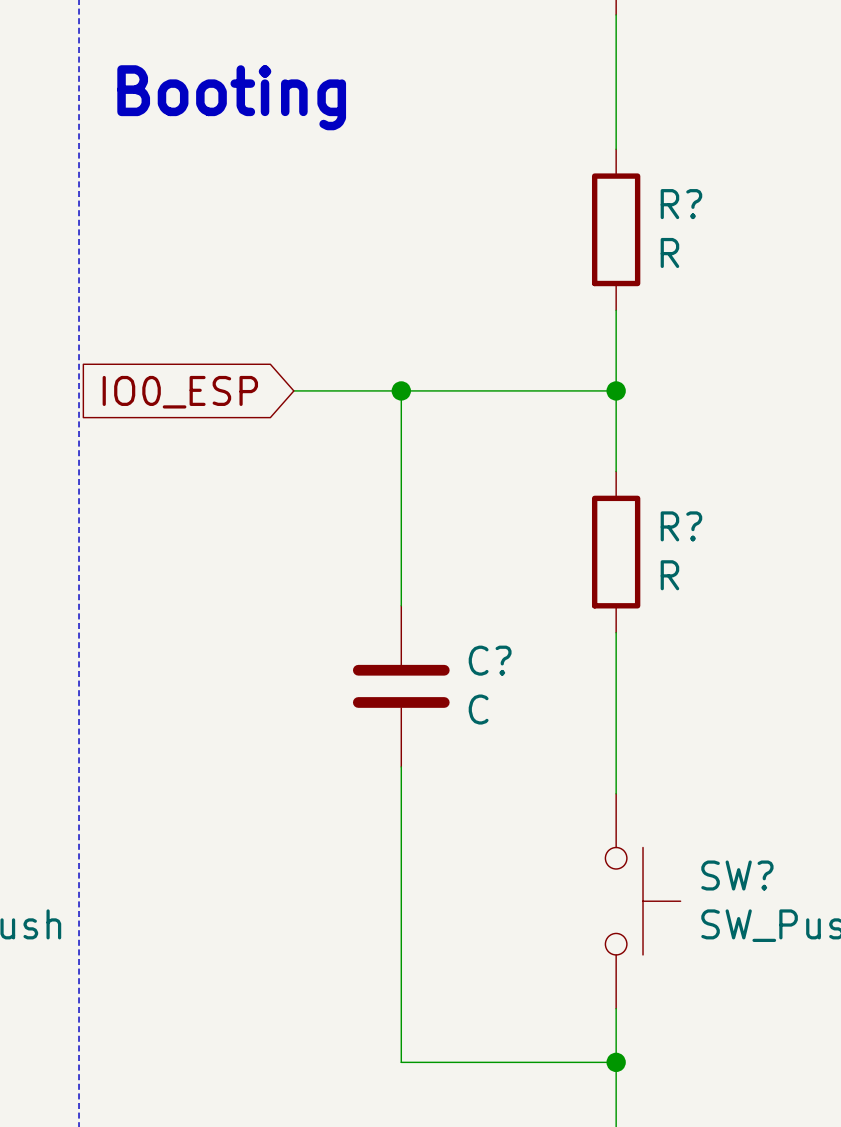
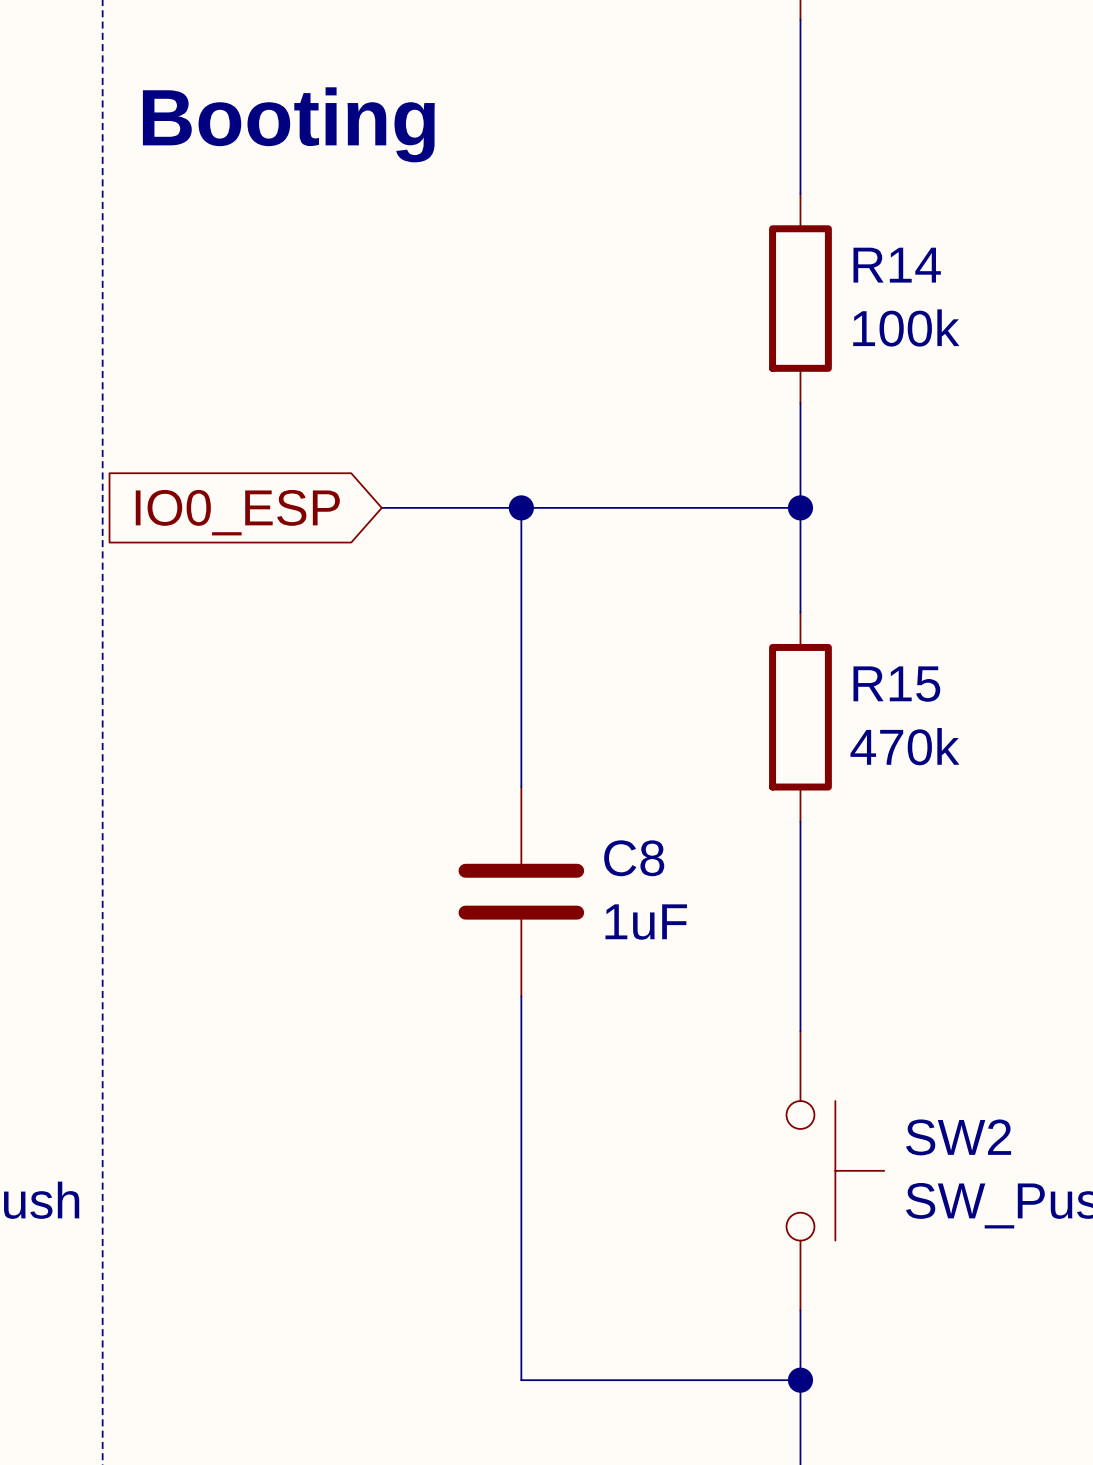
R? name: R? (681, 204) -> R14 (897, 265)
R? value: R (669, 252) -> 100k (906, 327)
R? name: R? (681, 526) -> R15 (896, 684)
R? value: R (669, 575) -> 470k (904, 746)
C? name: C? (490, 660) -> C8 (634, 858)
C? value: C (478, 709) -> 1uF (646, 922)
SW? name: SW? (737, 875) -> SW2 (958, 1137)

